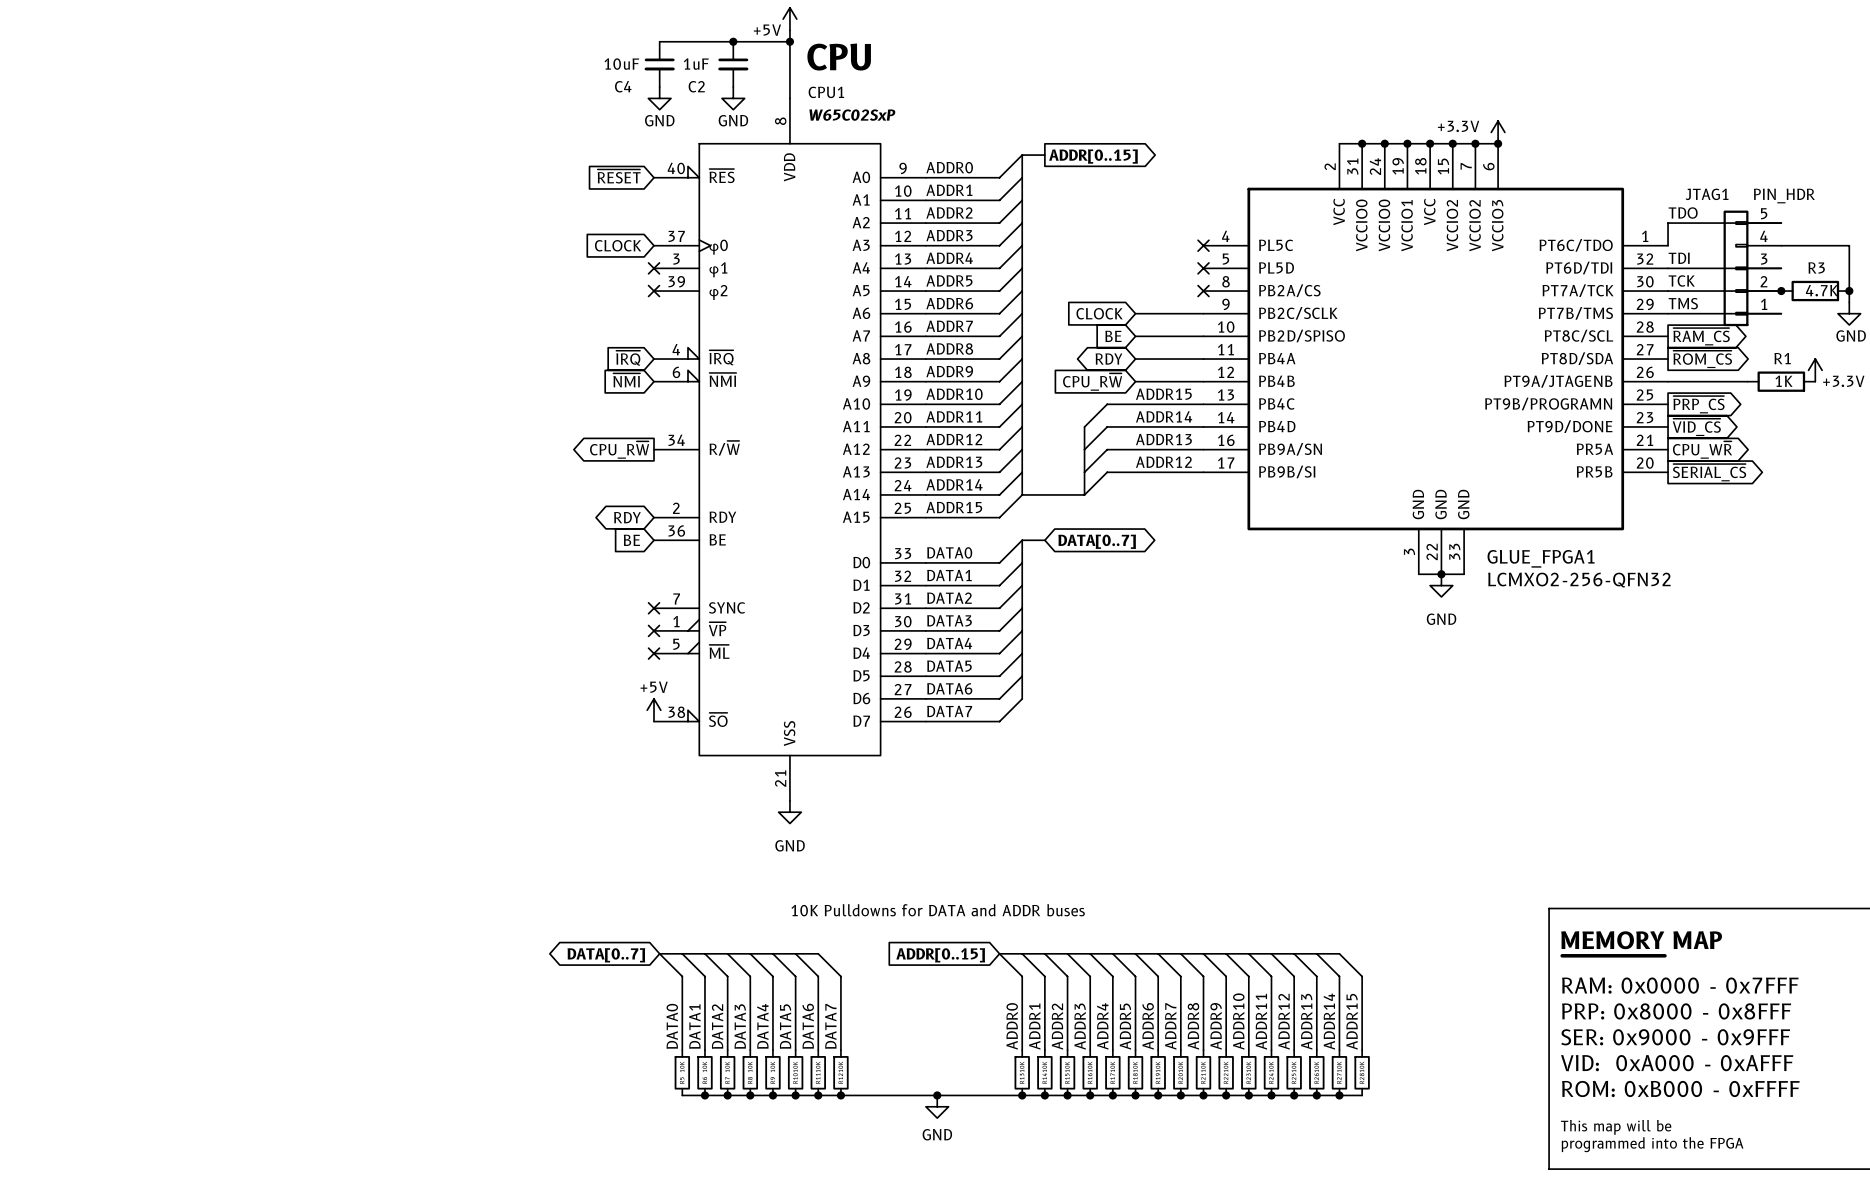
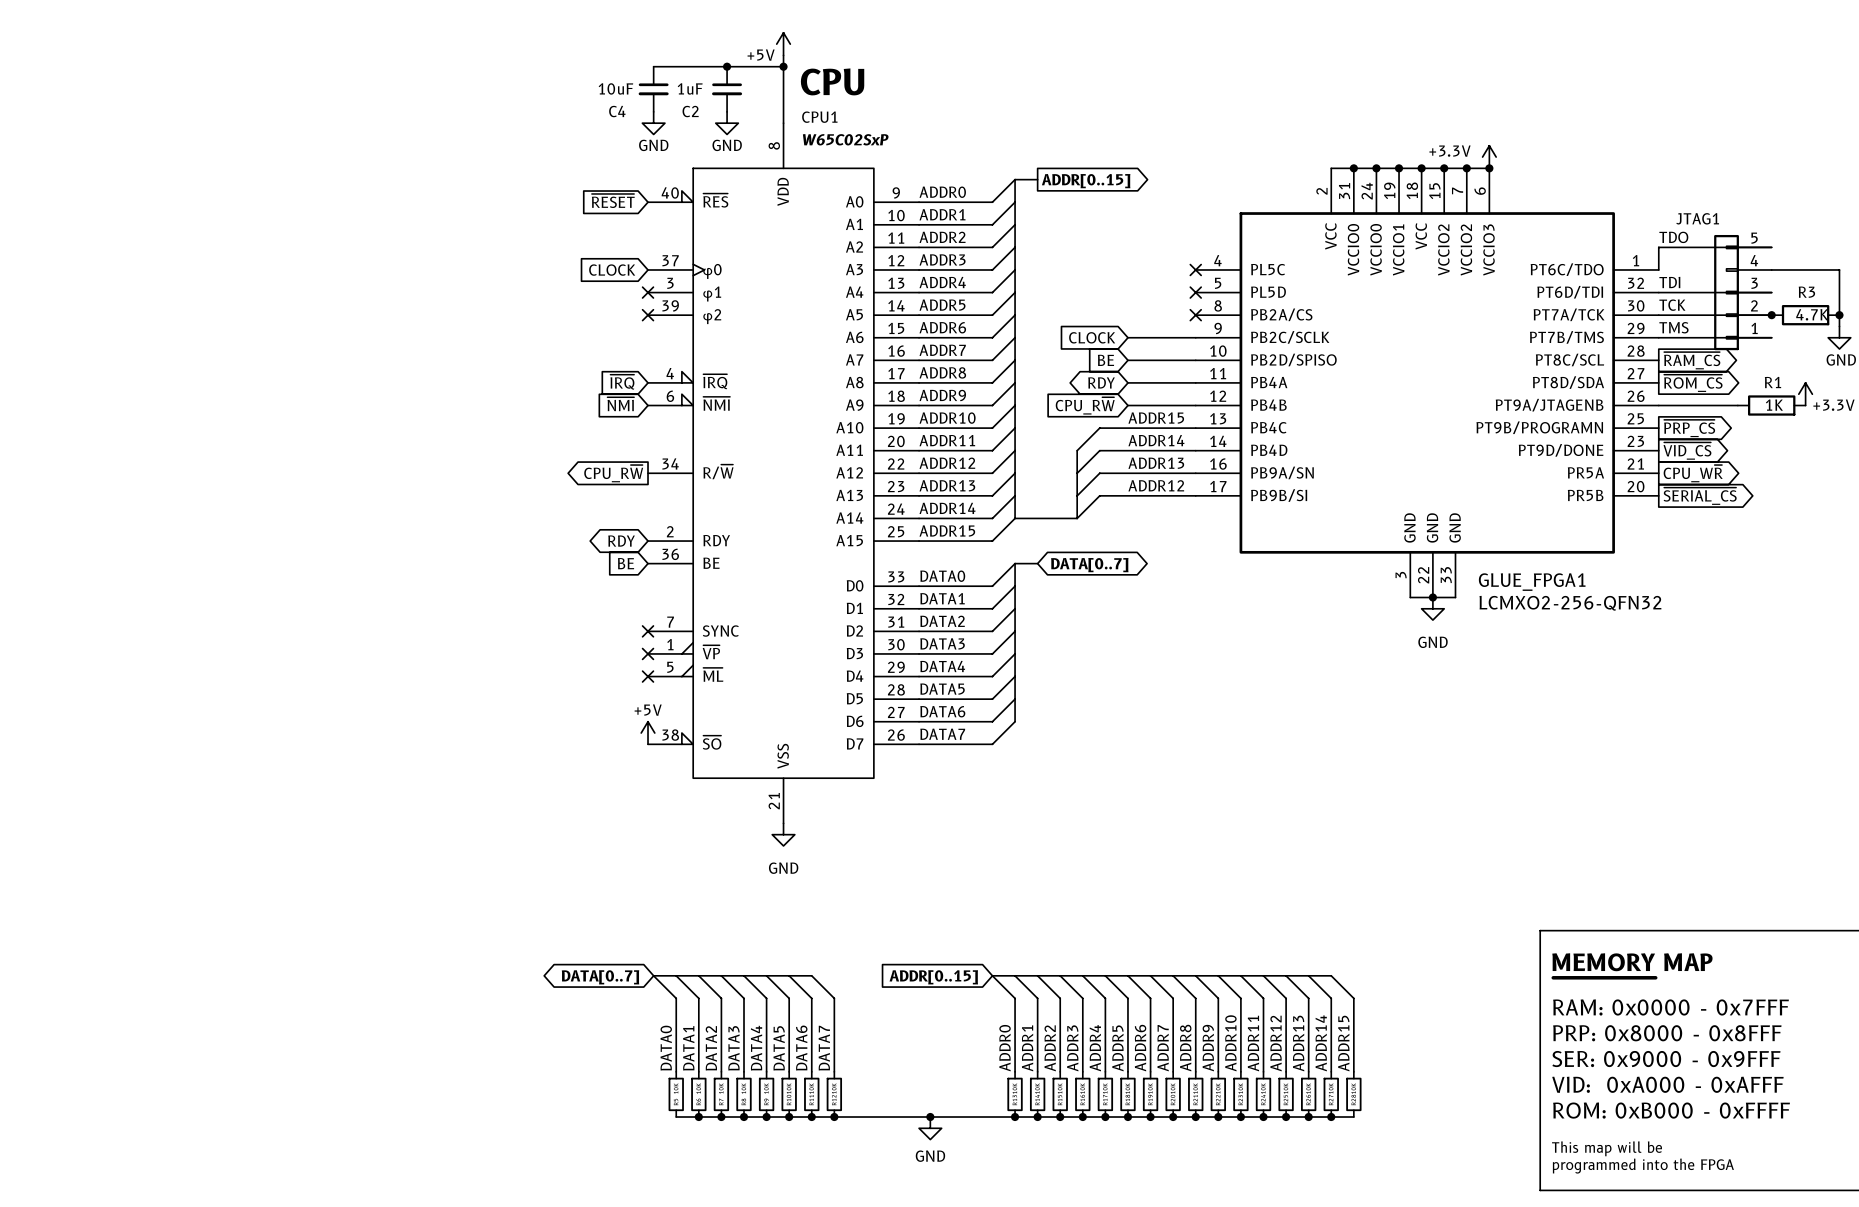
JTAG1 value: PIN_HDR (1784, 195) -> none
text: 10K Pulldowns for DATA and ADDR buses (938, 910) -> none

